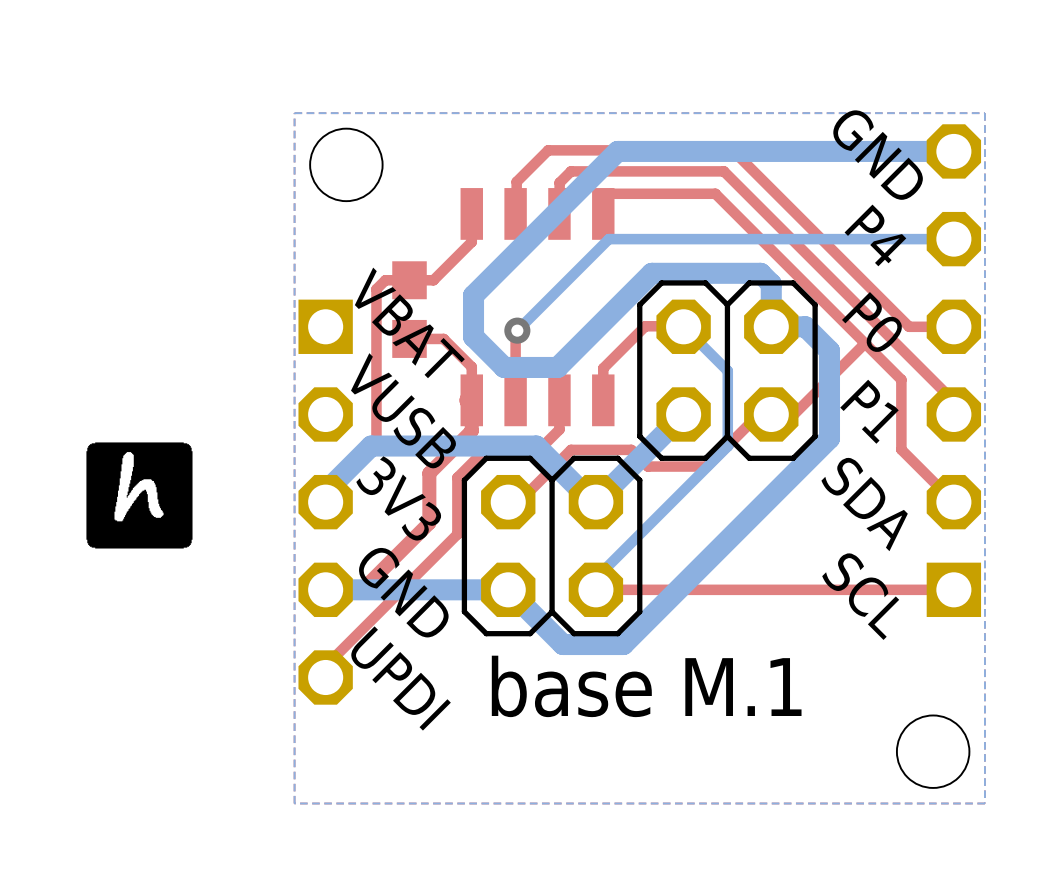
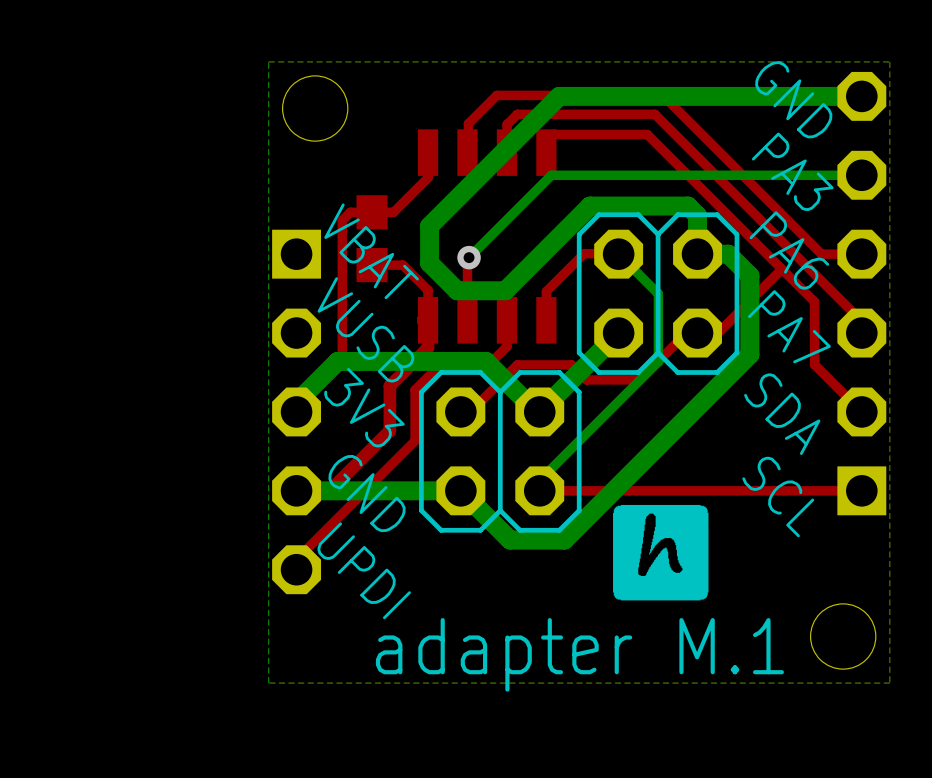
text: P4 (875, 235) -> PA3 (792, 171)
text: P0 (872, 322) -> PA6 (789, 250)
text: P1 (869, 411) -> PA7 (789, 326)
drawing: [86, 442, 193, 549] -> none
drawing: none -> [613, 504, 709, 601]
text: base M.1 (646, 686) -> adapter M.1 (579, 654)

